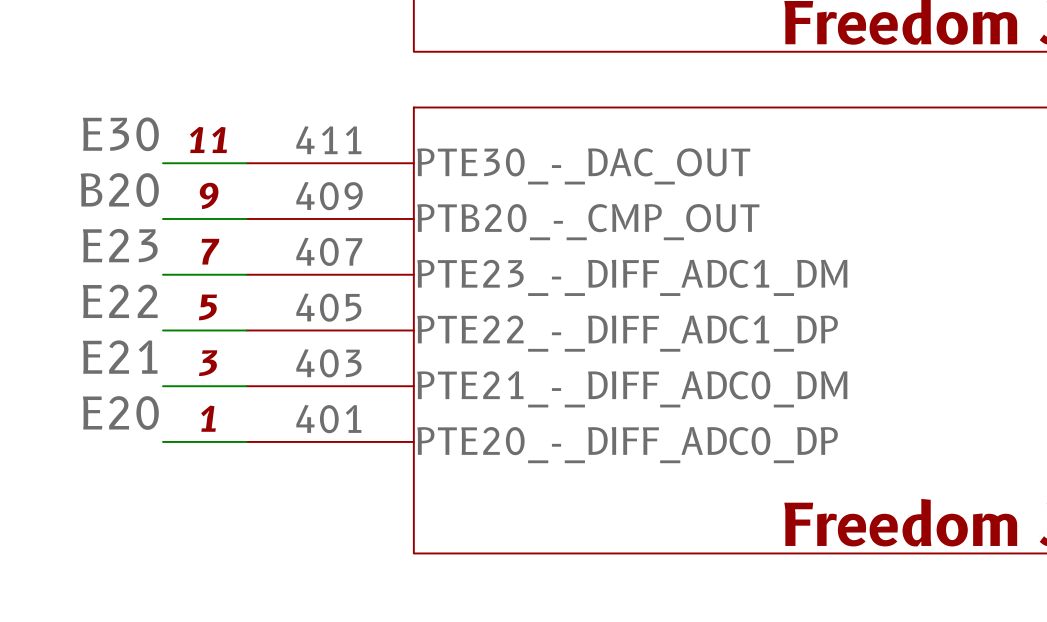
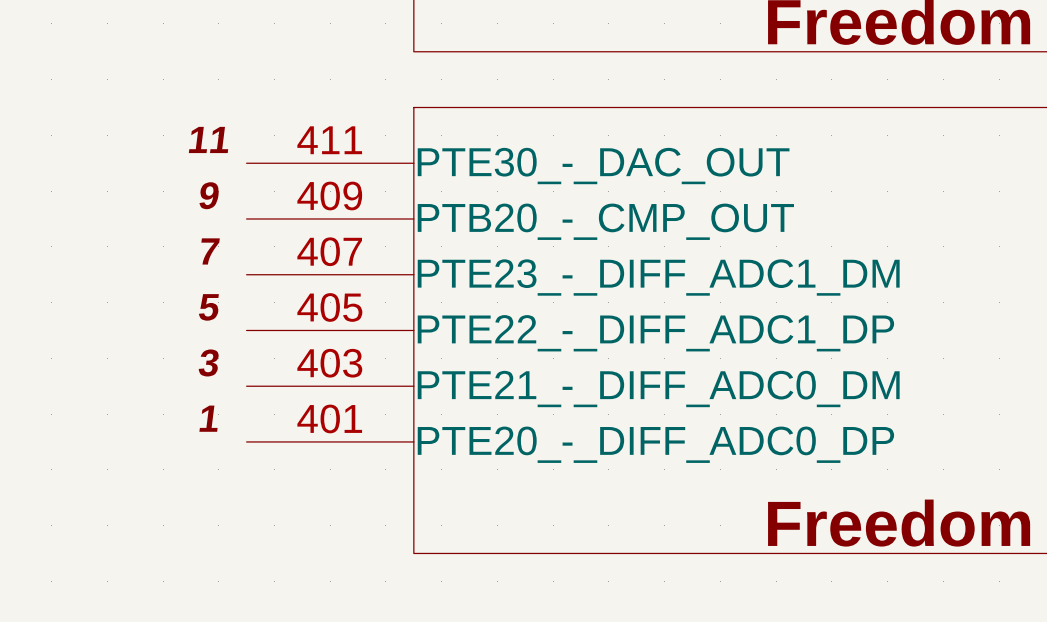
label: E30 (120, 134) -> none
wire: (163, 163) (246, 163) -> none
label: B20 (119, 190) -> none
wire: (163, 218) (246, 218) -> none
label: E23 (120, 245) -> none
wire: (163, 274) (246, 274) -> none
label: E22 (120, 301) -> none
wire: (163, 330) (246, 330) -> none
label: E21 (120, 357) -> none
wire: (163, 386) (246, 386) -> none
label: E20 (120, 413) -> none
wire: (163, 441) (246, 441) -> none

